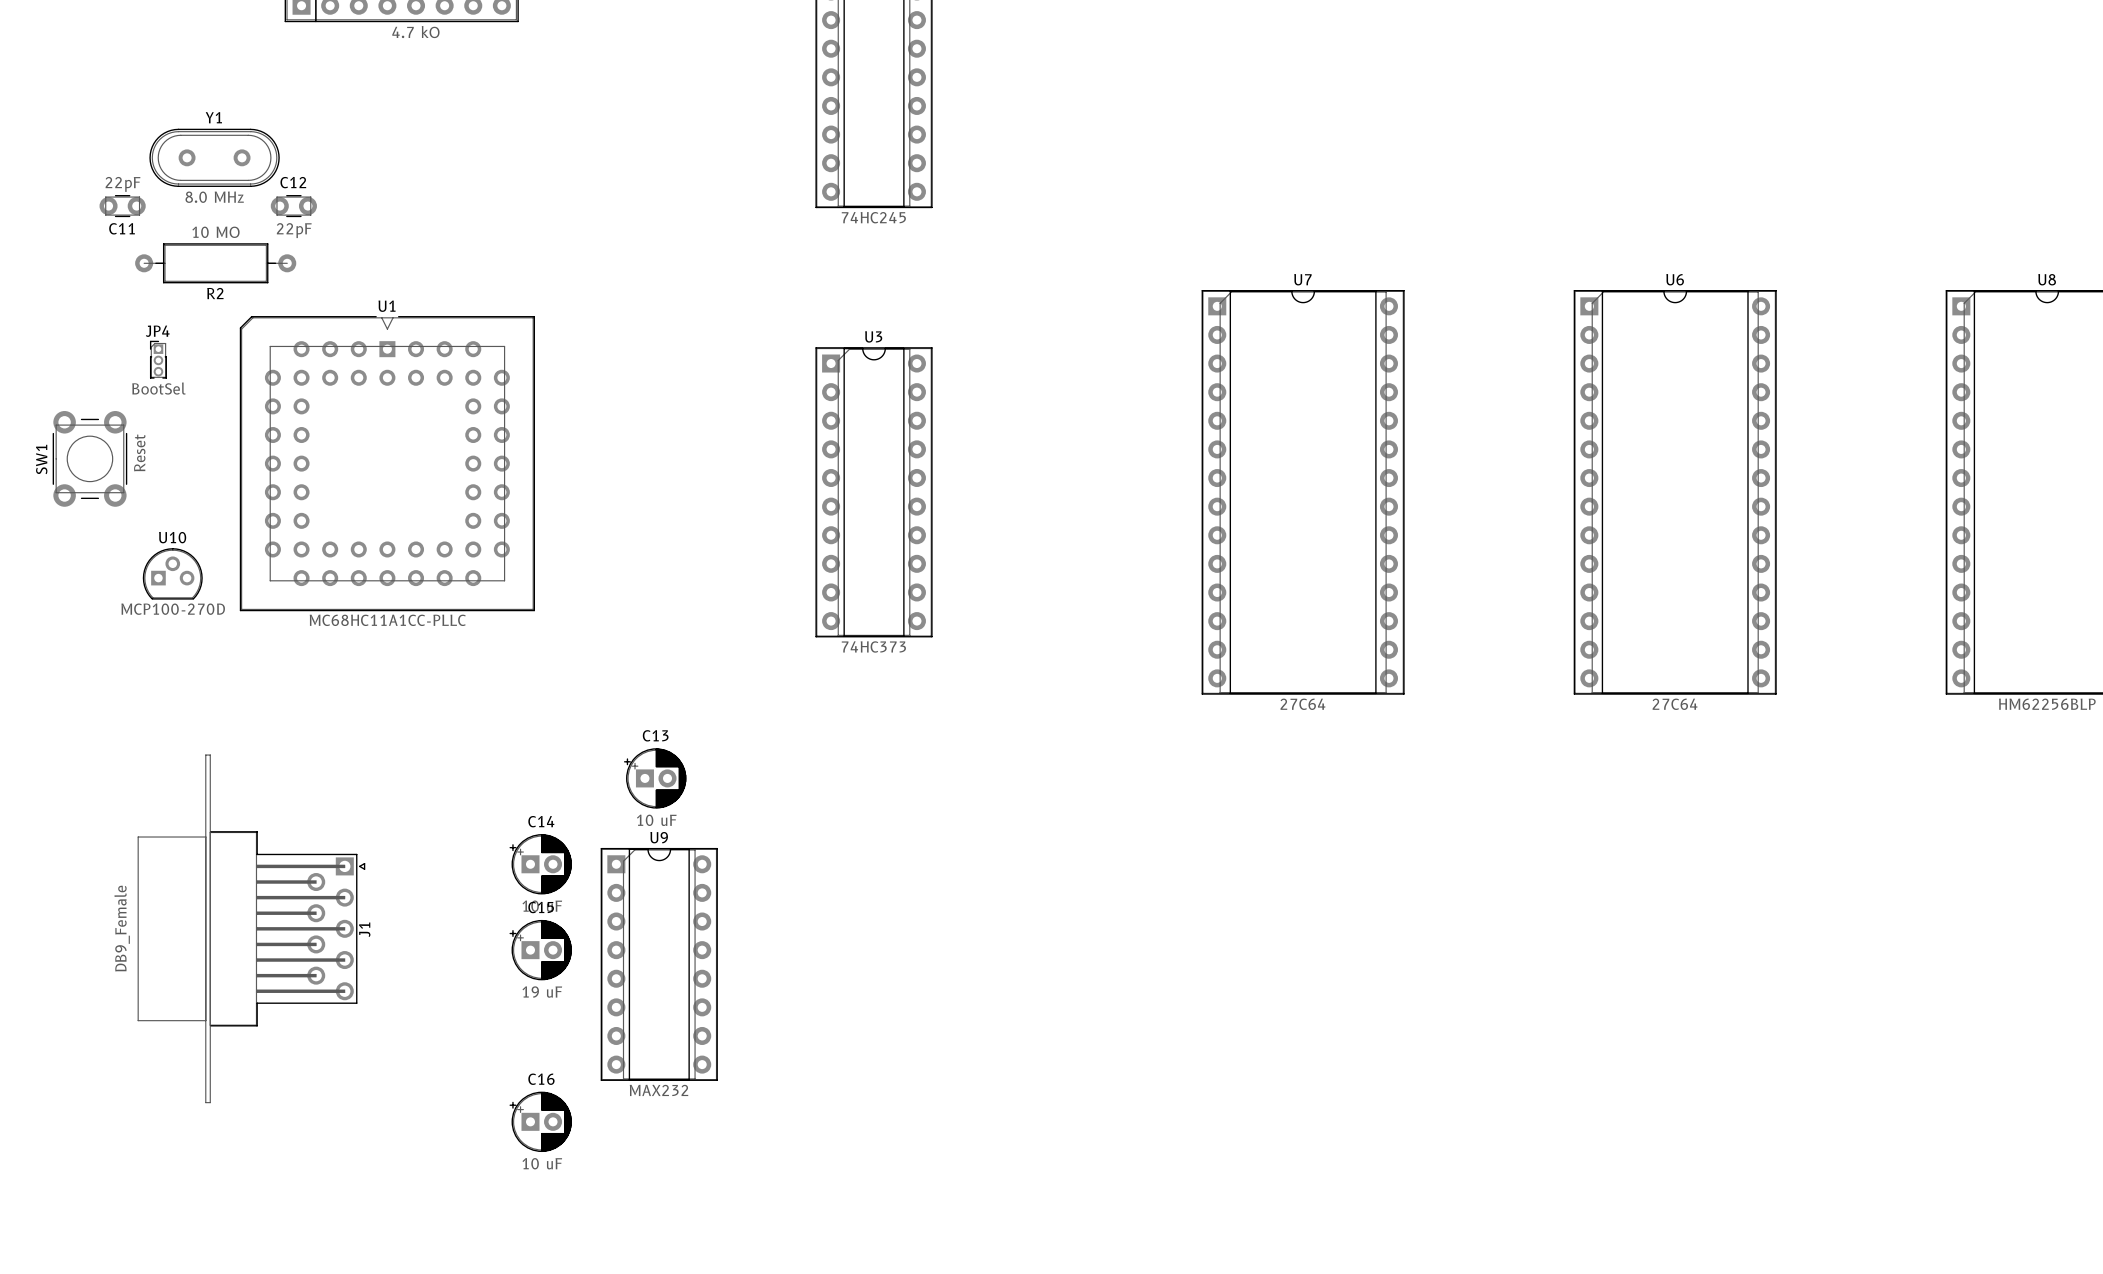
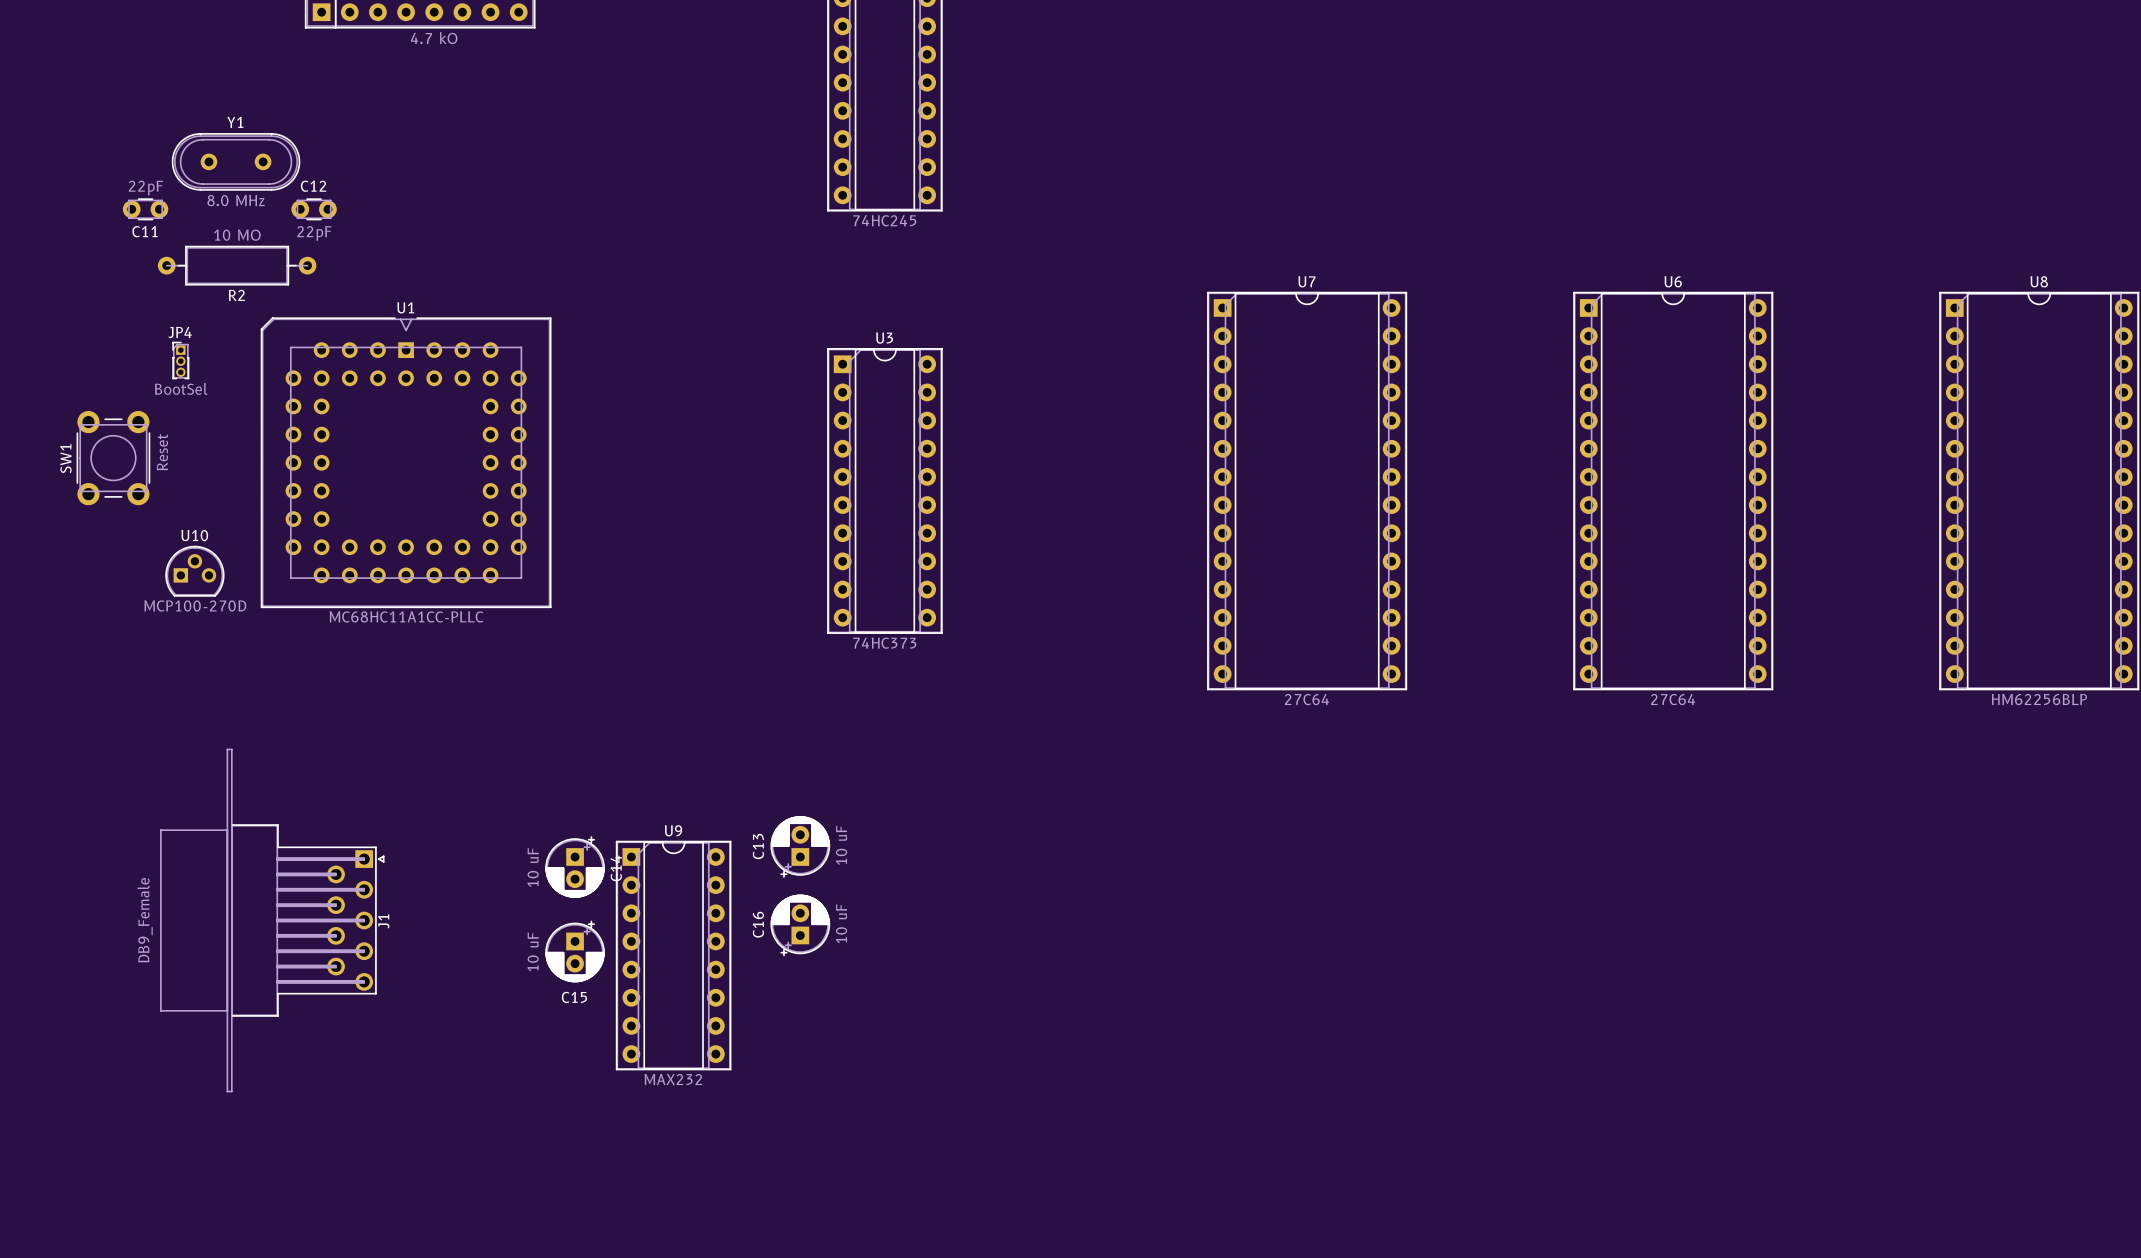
C13 rotation: 0° (655, 778) -> 90° counterclockwise (800, 846)
C13 position: (655, 778) -> (800, 846)
C14 rotation: 0° (540, 864) -> 90° clockwise (575, 867)
C15 name position: C15 (541, 907) -> C15 (574, 997)
C15 rotation: 0° (540, 950) -> 90° clockwise (575, 951)
C15 value: 19 uF (542, 992) -> 10 uF (533, 952)
C16 rotation: 0° (540, 1121) -> 90° counterclockwise (800, 925)
C16 position: (540, 1121) -> (800, 925)

